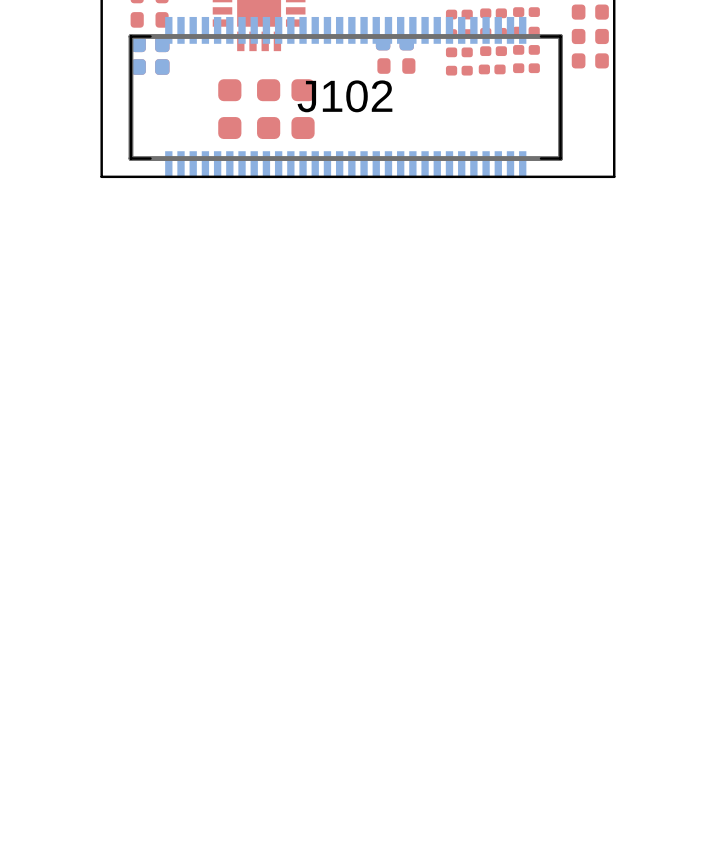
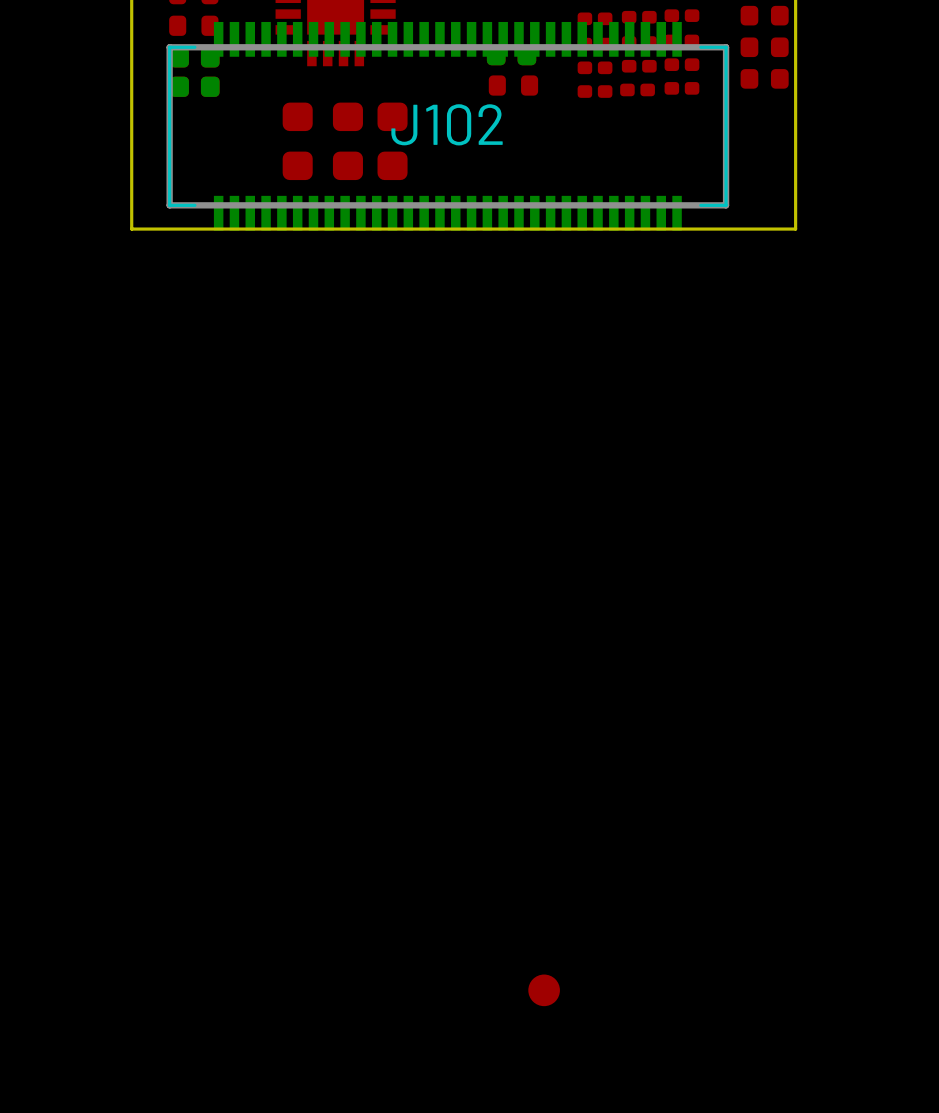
part: none -> (544, 990)

